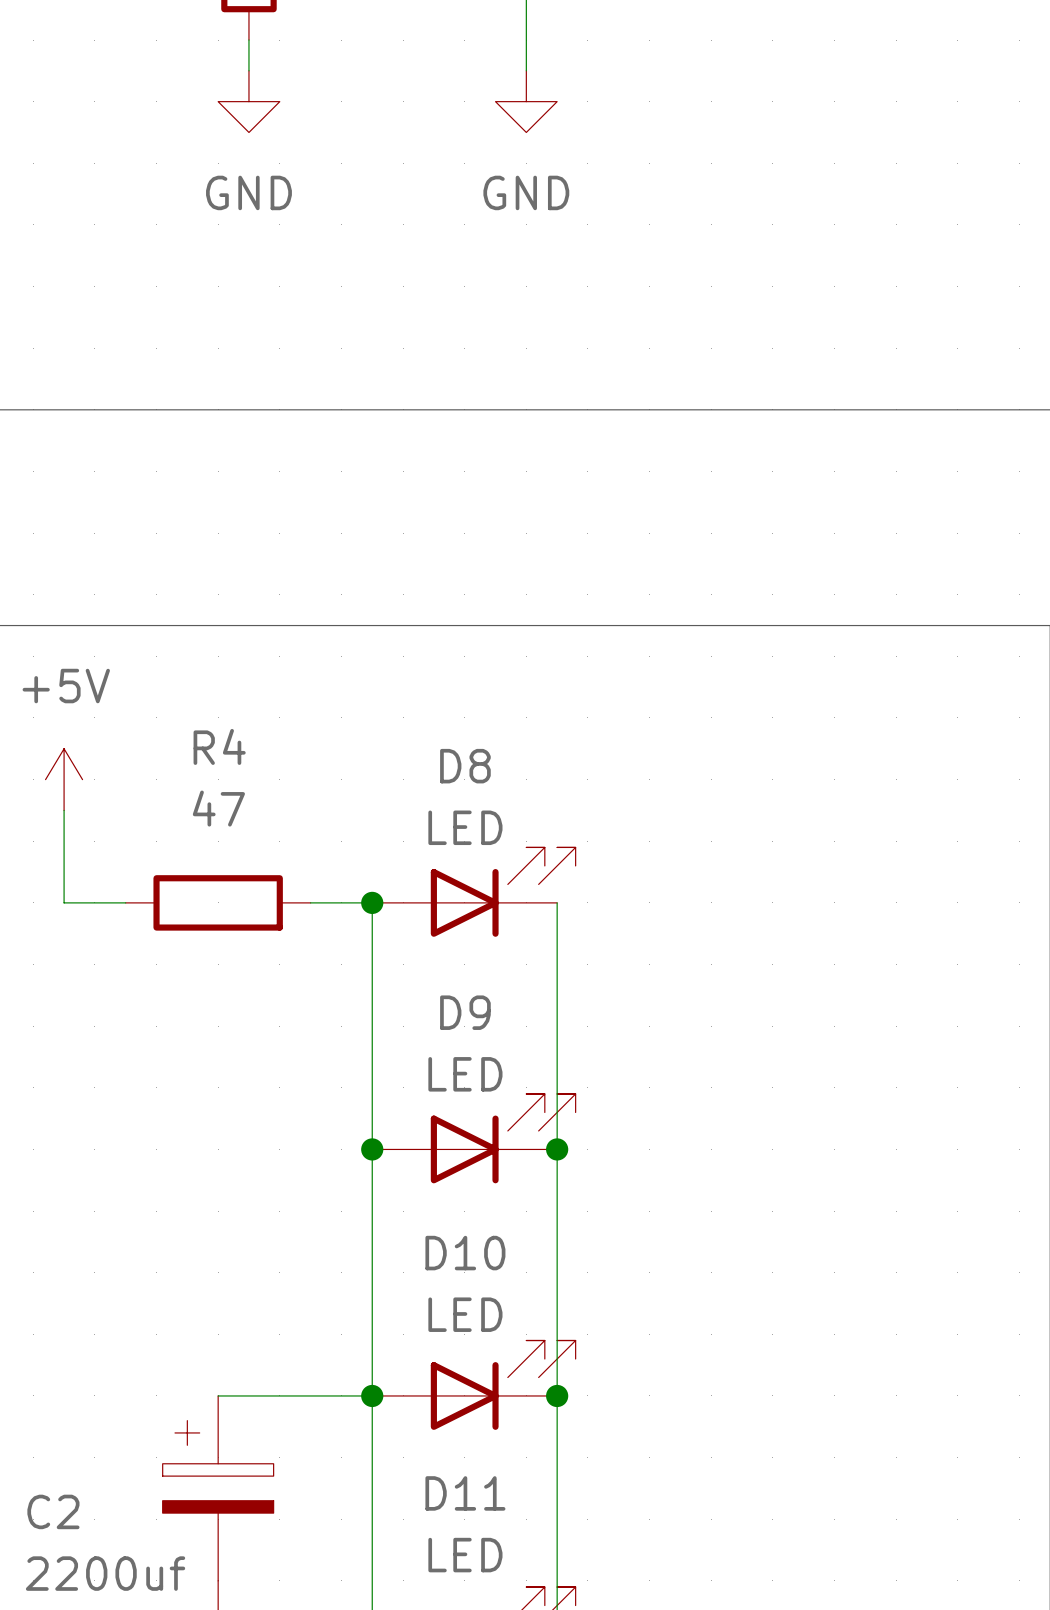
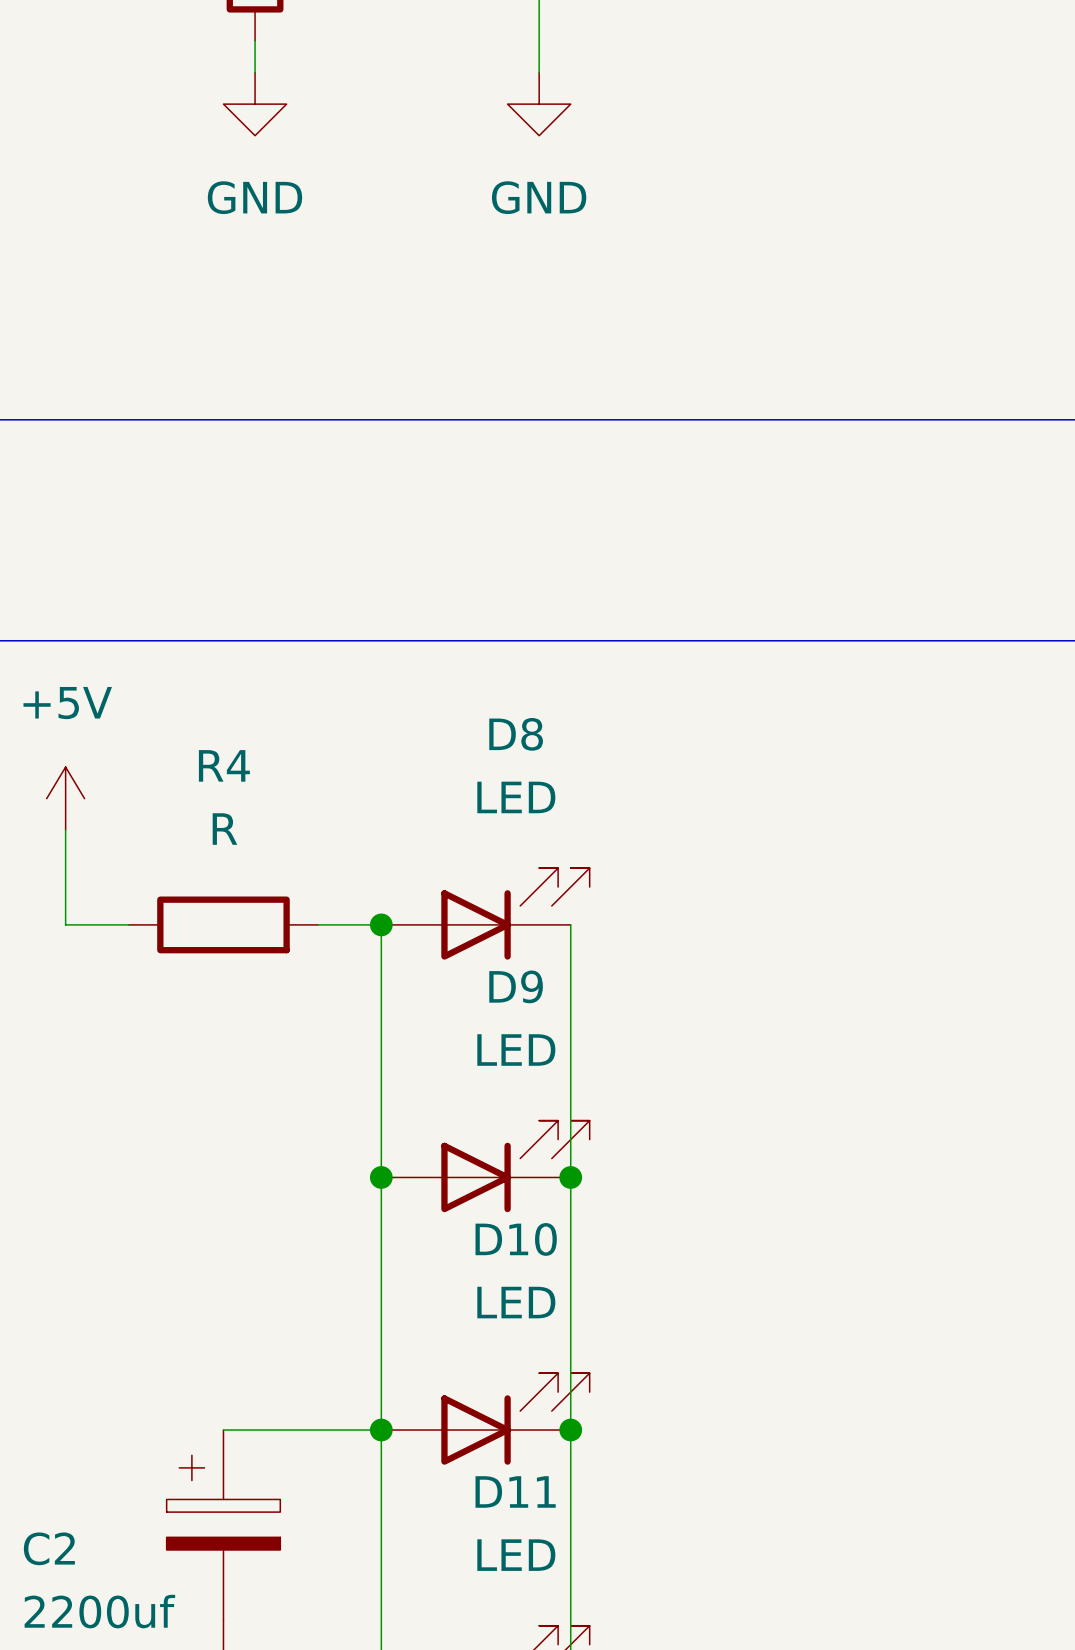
D8 name position: D8 (465, 766) -> D8 (516, 734)
R4 value: 47 (218, 808) -> R (224, 829)
D8 value position: LED (465, 827) -> LED (516, 797)
D9 name position: D9 (465, 1012) -> D9 (516, 986)
D9 value position: LED (465, 1074) -> LED (516, 1050)
D10 name position: D10 (465, 1253) -> D10 (516, 1239)
D10 value position: LED (465, 1314) -> LED (516, 1302)
D11 name position: D11 (465, 1493) -> D11 (515, 1491)
D11 value position: LED (465, 1555) -> LED (516, 1555)

